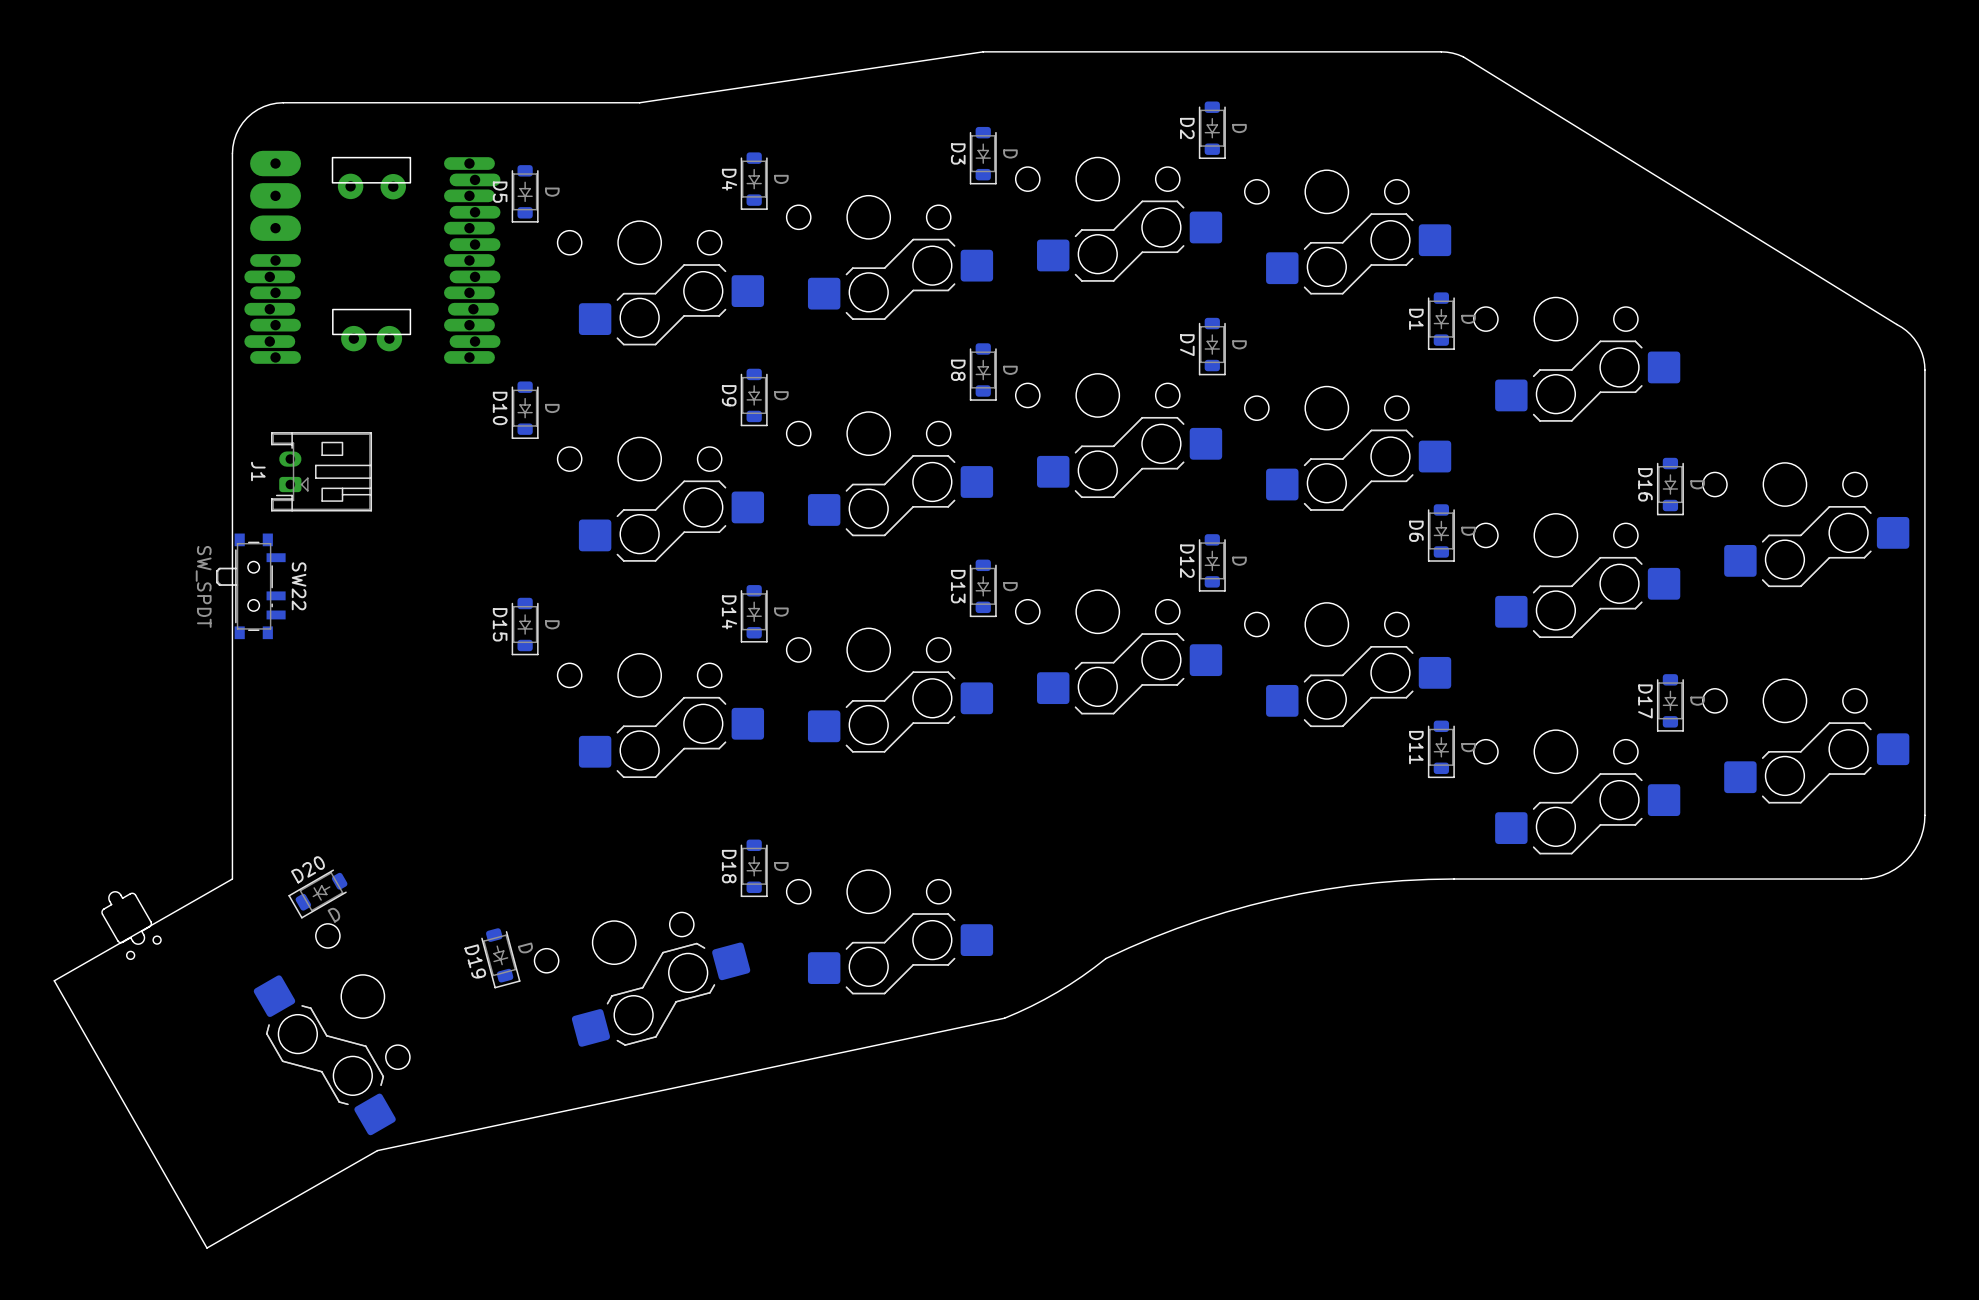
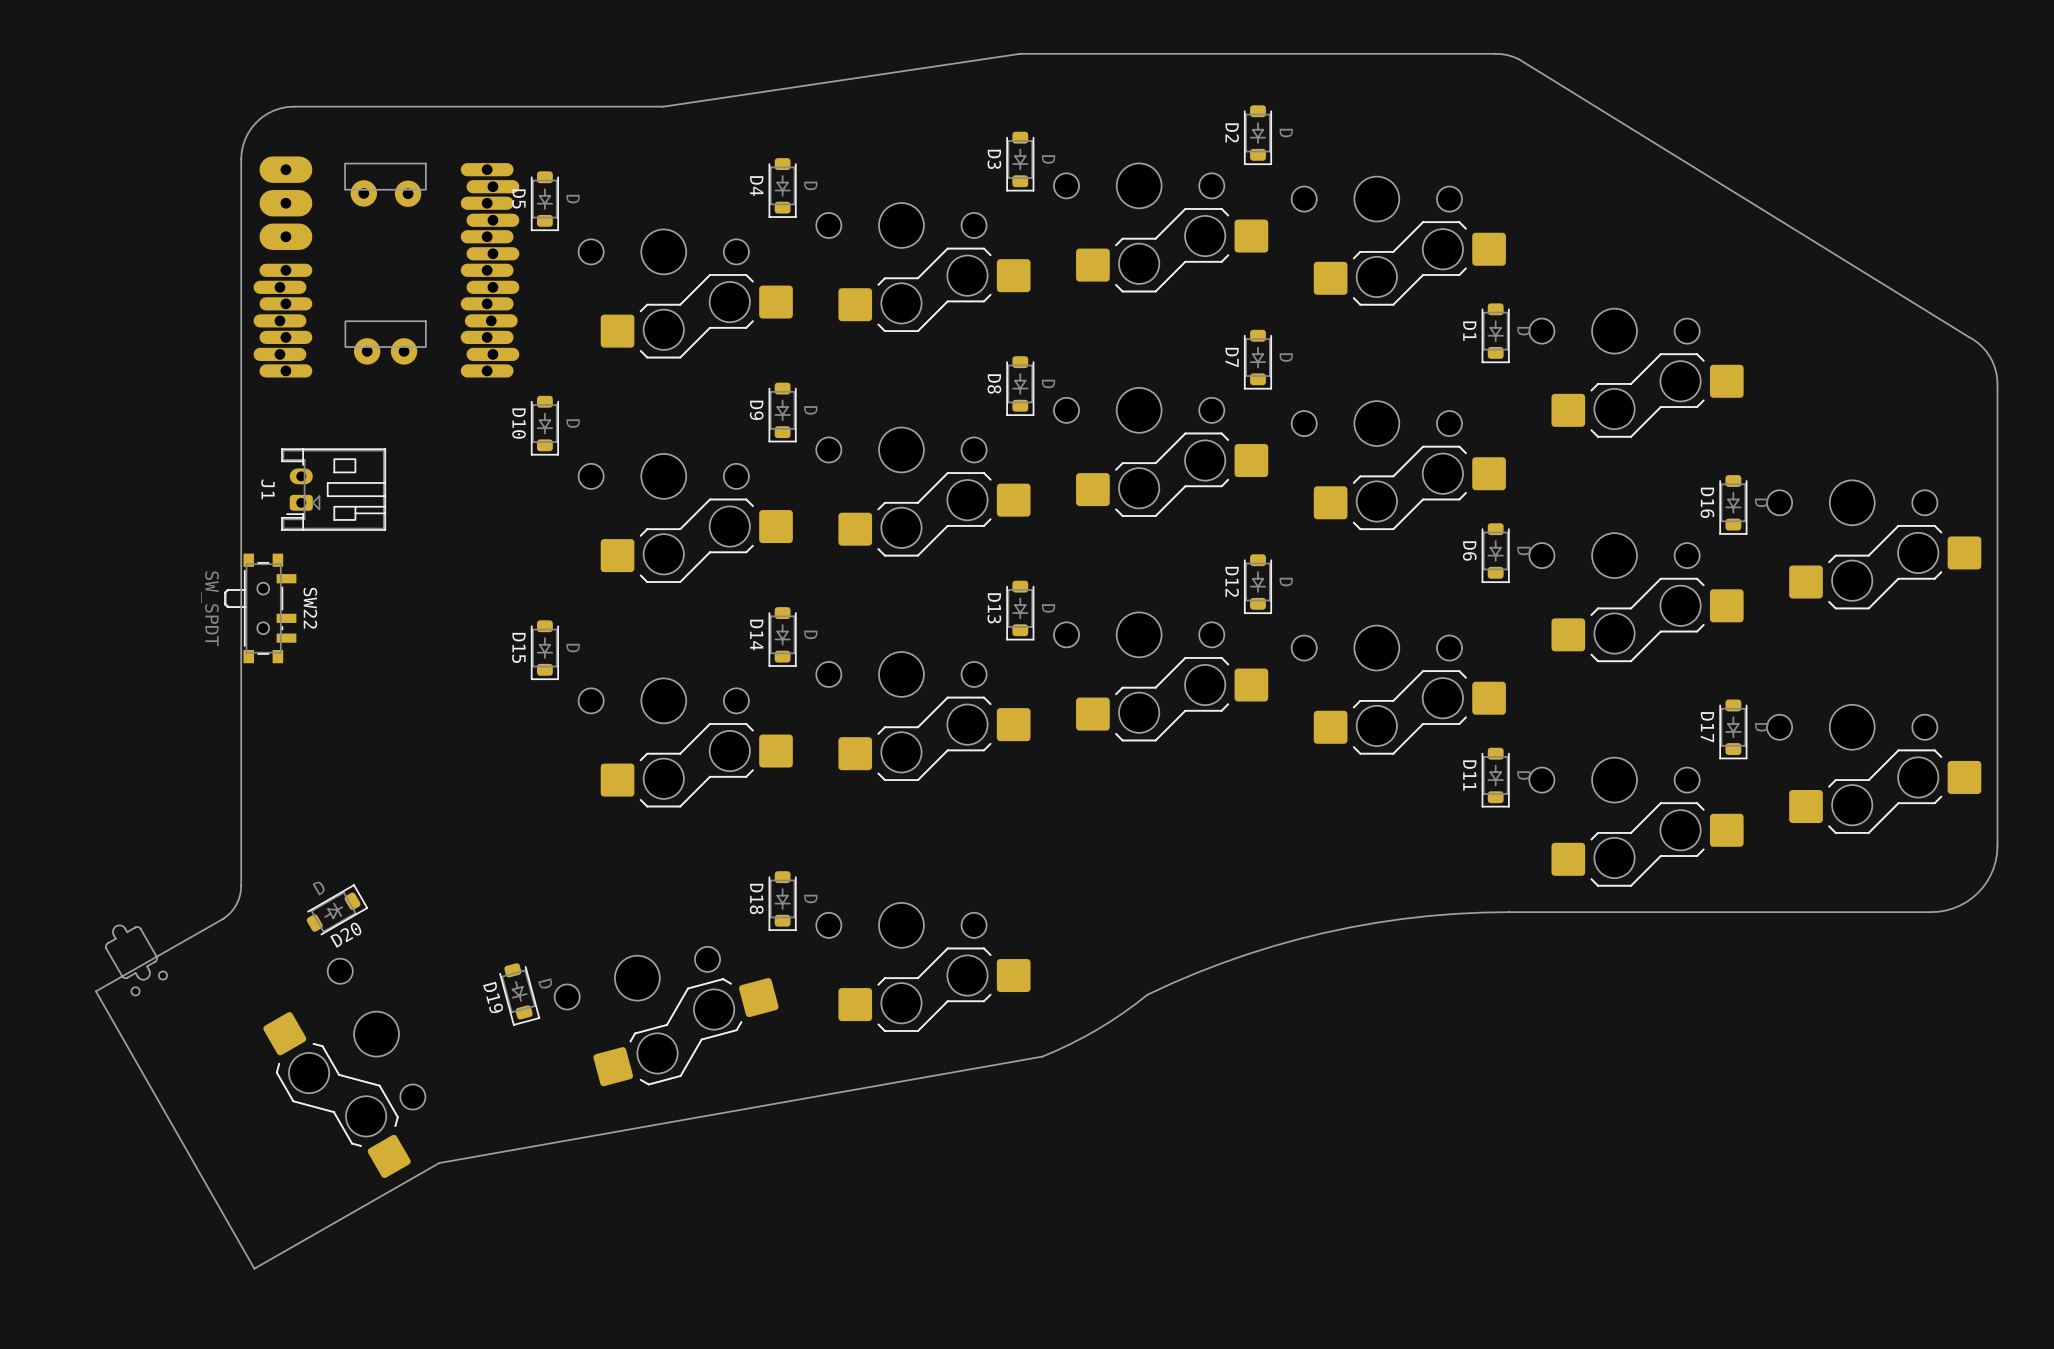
board edge: (232, 853) (232, 879) (54, 980) (206, 1248) (377, 1150) (1004, 1018) -> (241, 885) (236, 904) (223, 918) (95, 991) (254, 1268) (439, 1163) (1042, 1056)
D20 rotation: 0° (317, 893) -> 180° (337, 909)

